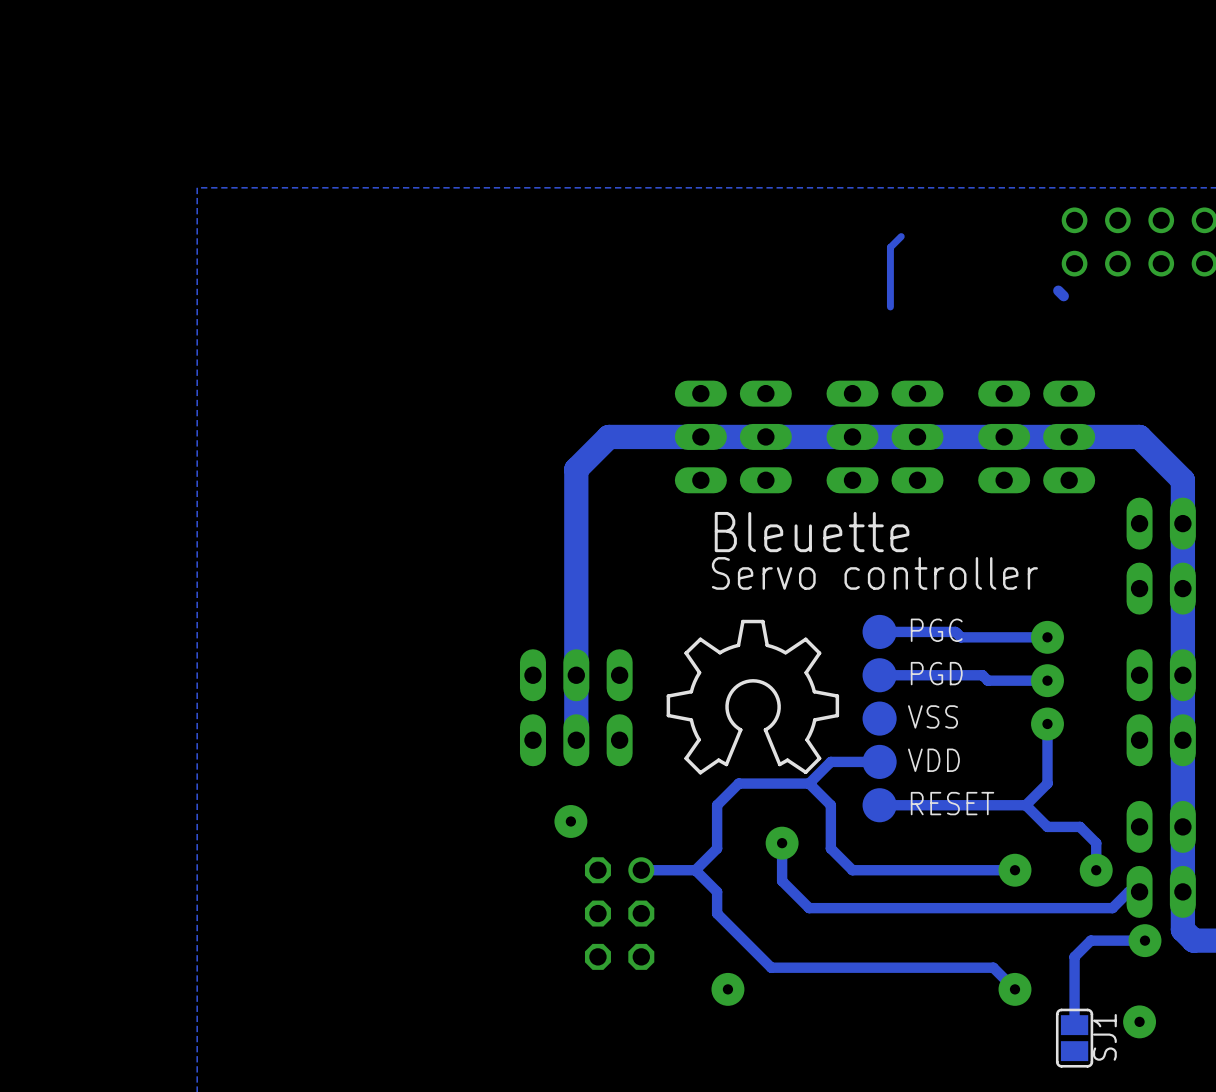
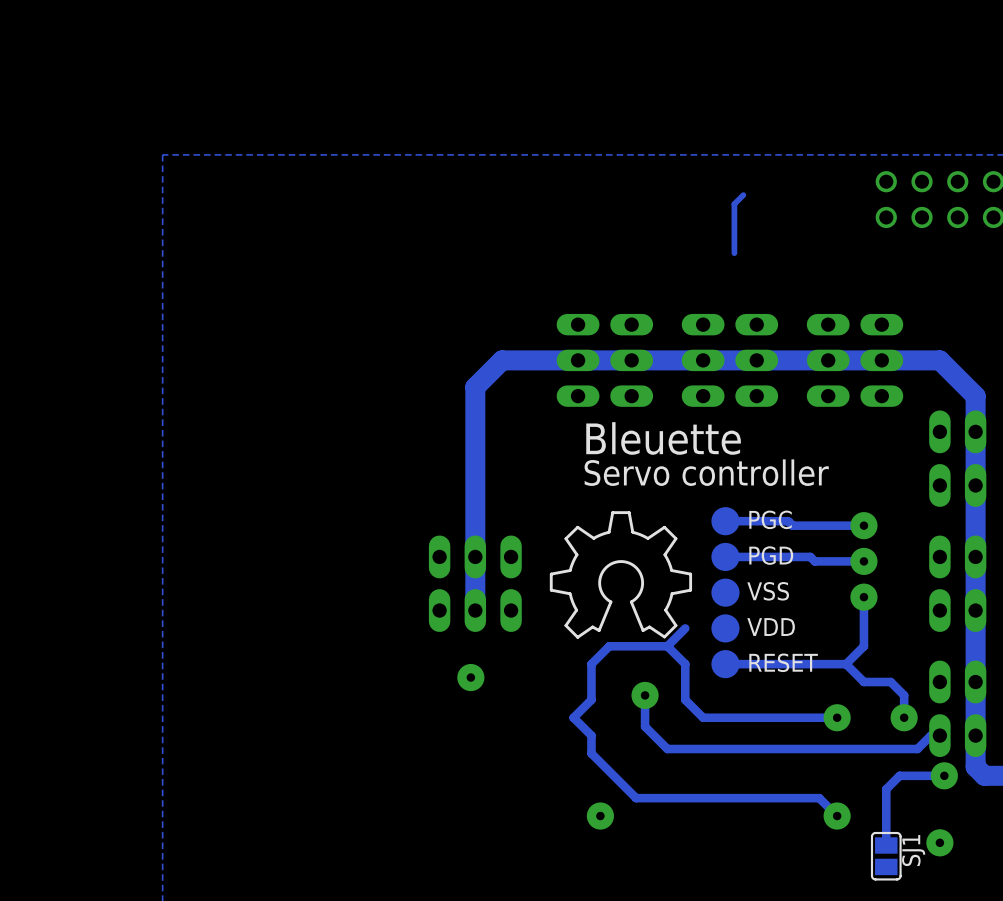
track: (1058, 290) (1063, 296) -> none
track: (879, 761) (830, 761) -> none
track: (695, 870) (641, 870) -> none
part: (619, 913) -> none

